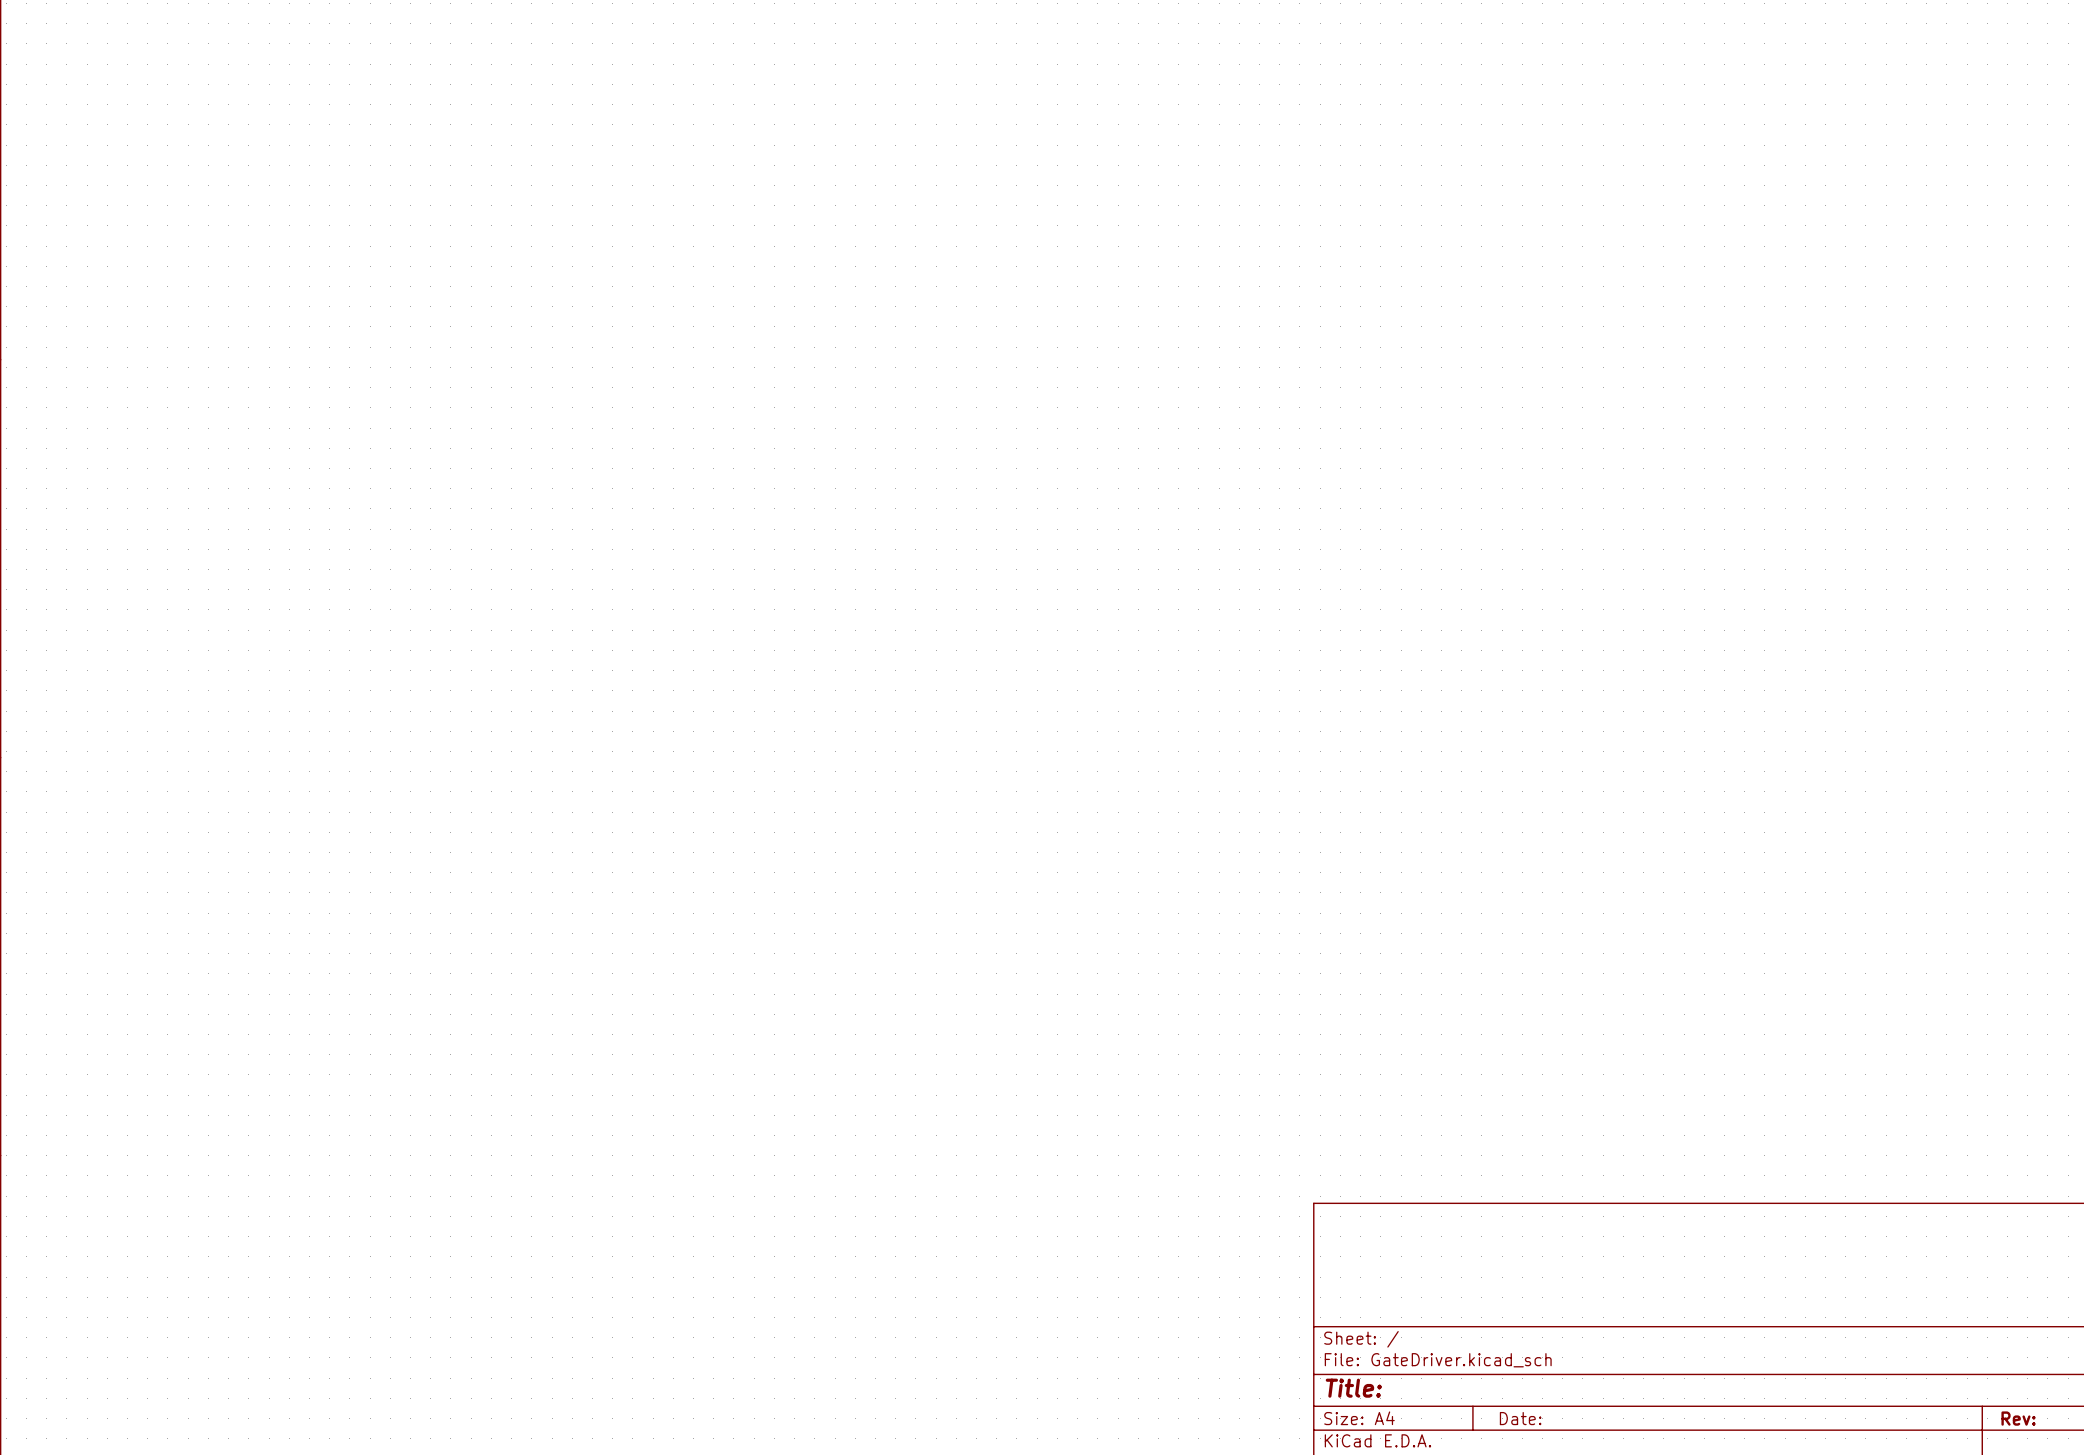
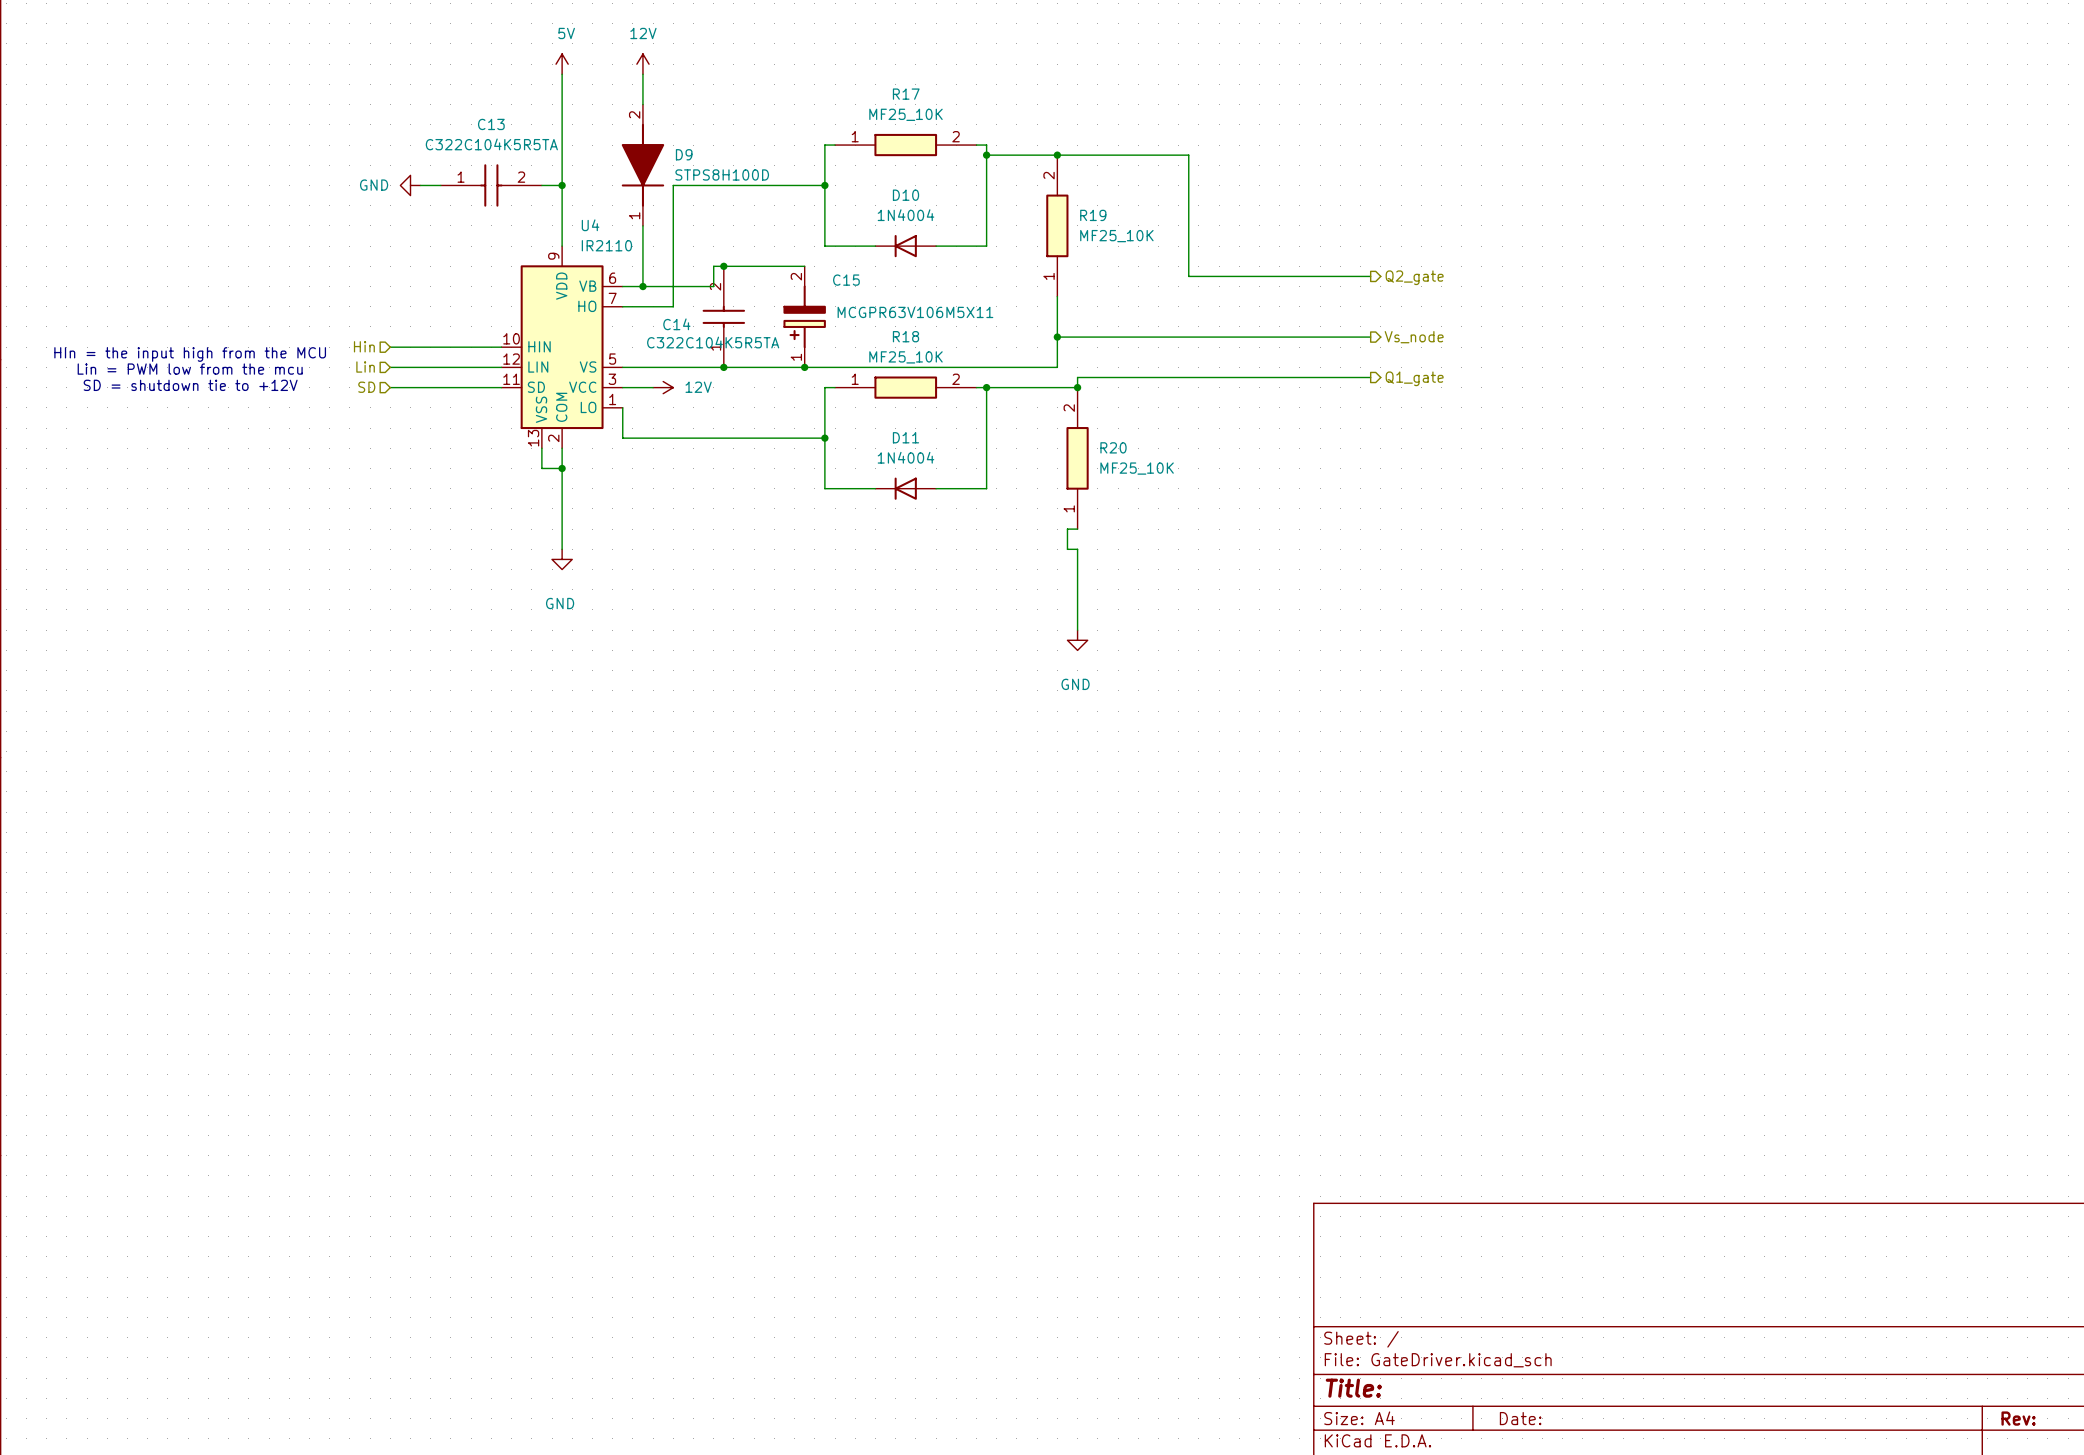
power symbol: none -> 5V (562, 64)
power symbol: none -> 12V (642, 64)
wire: none -> (562, 74) (562, 246)
wire: none -> (642, 74) (642, 104)
wire: none -> (835, 145) (824, 145) (824, 246) (875, 246)
R17: none -> MF25_10K (905, 145)
wire: none -> (976, 145) (986, 145) (986, 246) (936, 246)
wire: none -> (986, 155) (1188, 155) (1188, 276) (1370, 276)
junction: none -> (986, 155)
junction: none -> (1057, 155)
D9: none -> STPS8H100D (642, 165)
power symbol: none -> GND (410, 185)
wire: none -> (420, 185) (440, 185)
C13: none -> C322C104K5R5TA (491, 185)
wire: none -> (541, 185) (562, 185)
junction: none -> (562, 185)
wire: none -> (824, 185) (673, 185) (673, 306) (622, 306)
junction: none -> (824, 185)
wire: none -> (642, 225) (642, 286)
R19: none -> MF25_10K (1057, 225)
D10: none -> 1N4004 (905, 246)
junction: none -> (723, 266)
wire: none -> (804, 266) (713, 266) (713, 286) (622, 286)
hierarchical label: none -> Q2_gate (1414, 277)
junction: none -> (642, 286)
wire: none -> (1057, 296) (1057, 367) (622, 367)
C14: none -> C322C104K5R5TA (723, 316)
C15: none -> MCGPR63V106M5X11 (804, 316)
wire: none -> (1057, 337) (1370, 337)
junction: none -> (1057, 337)
hierarchical label: none -> Vs_node (1414, 337)
hierarchical label: none -> Hin (364, 346)
wire: none -> (390, 347) (501, 347)
U4: none -> IR2110 (562, 347)
text: none -> HIn = the input high from the MCU (190, 354)
hierarchical label: none -> Lin (365, 367)
wire: none -> (390, 367) (501, 367)
junction: none -> (723, 367)
junction: none -> (804, 367)
text: none -> Lin = PWM low from the mcu (190, 369)
wire: none -> (1370, 377) (1077, 377) (1077, 387) (976, 387)
hierarchical label: none -> Q1_gate (1414, 378)
text: none -> SD = shutdown tie to +12V (190, 385)
hierarchical label: none -> SD (366, 387)
wire: none -> (390, 387) (501, 387)
wire: none -> (622, 387) (653, 387)
power symbol: none -> 12V (663, 387)
wire: none -> (835, 387) (824, 387) (824, 488) (875, 488)
R18: none -> MF25_10K (905, 387)
wire: none -> (986, 387) (986, 488) (936, 488)
junction: none -> (986, 387)
junction: none -> (1077, 387)
wire: none -> (622, 407) (622, 438) (824, 438)
junction: none -> (824, 438)
wire: none -> (541, 448) (541, 468) (562, 468)
wire: none -> (562, 448) (562, 549)
R20: none -> MF25_10K (1077, 458)
junction: none -> (562, 468)
D11: none -> 1N4004 (905, 488)
wire: none -> (1077, 529) (1067, 529) (1067, 549) (1077, 549) (1077, 630)
power symbol: none -> GND (562, 559)
power symbol: none -> GND (1077, 640)

